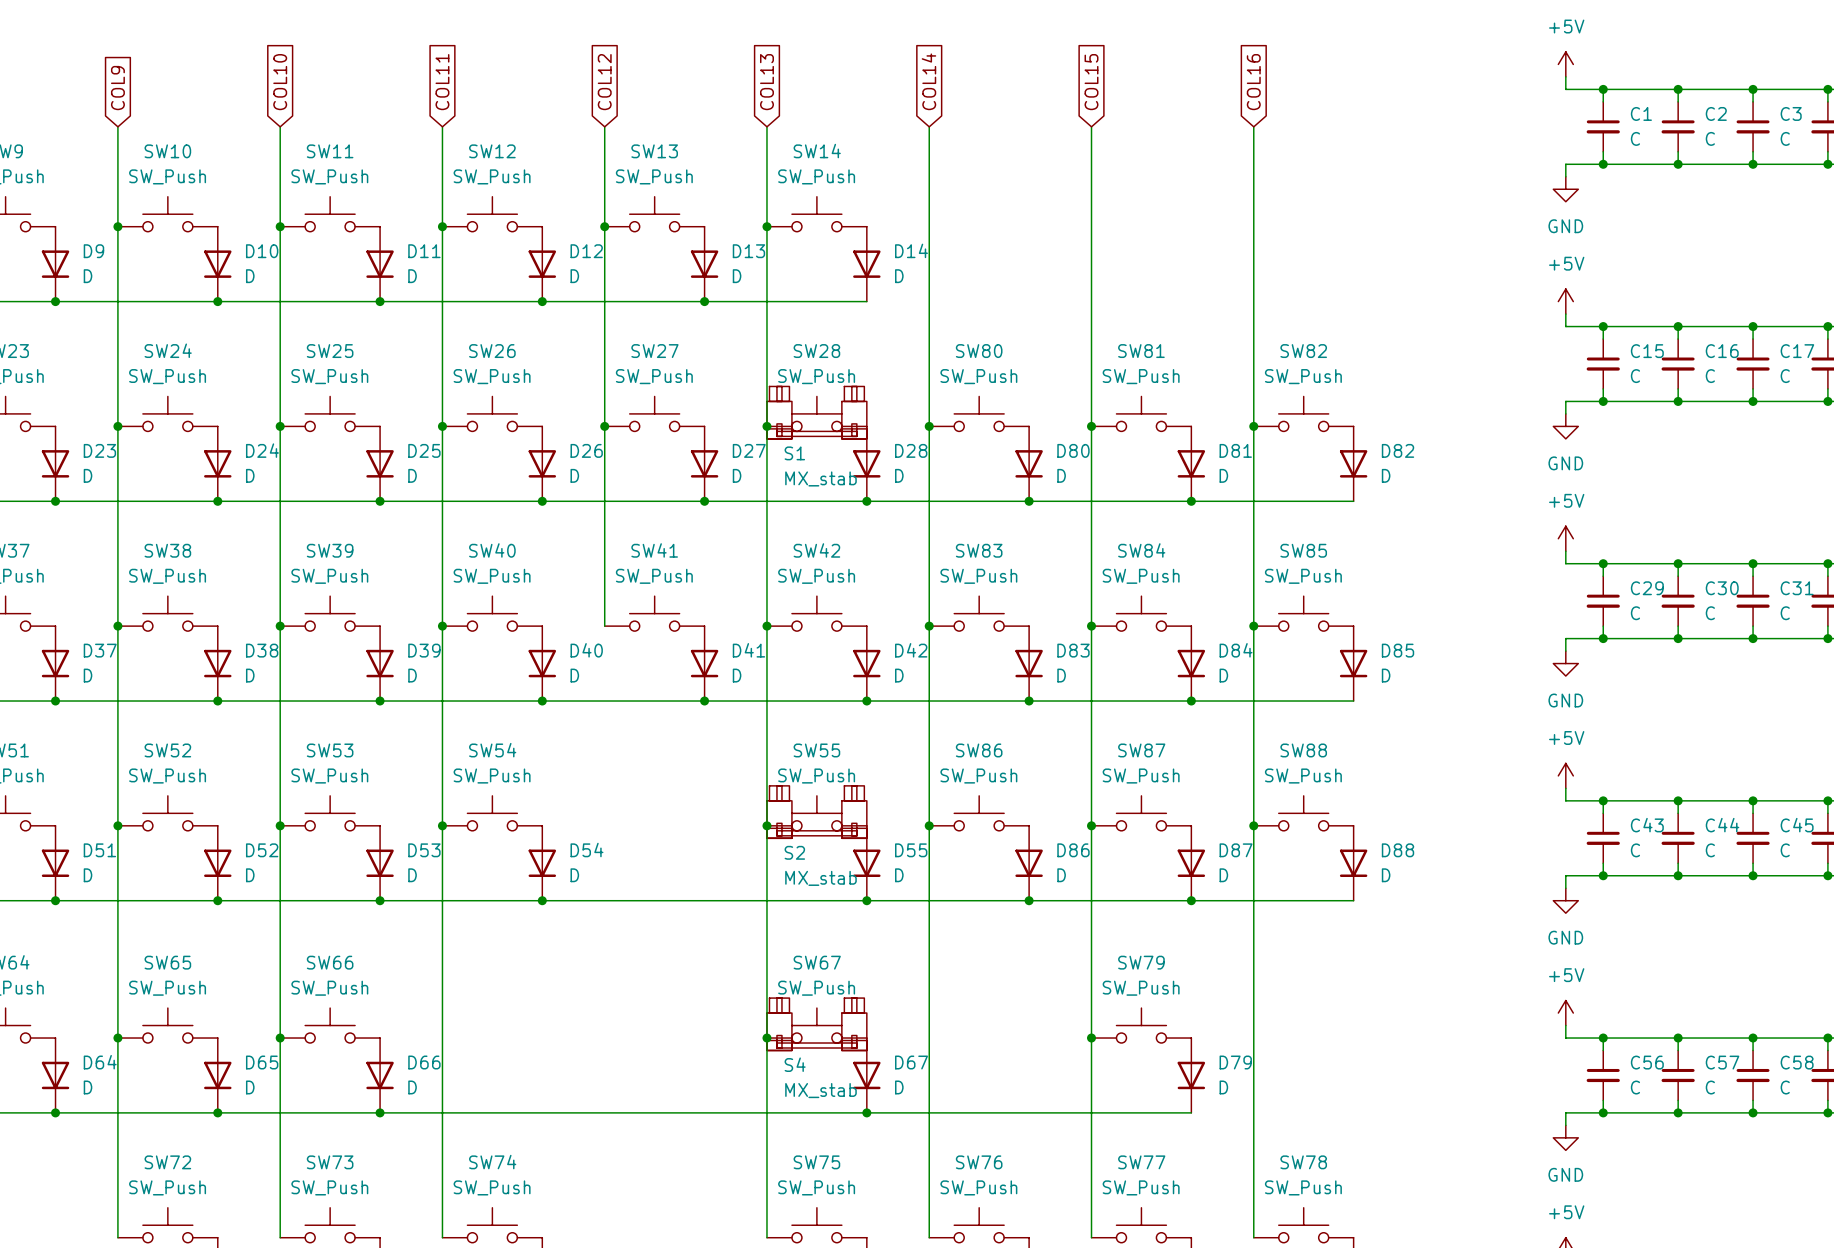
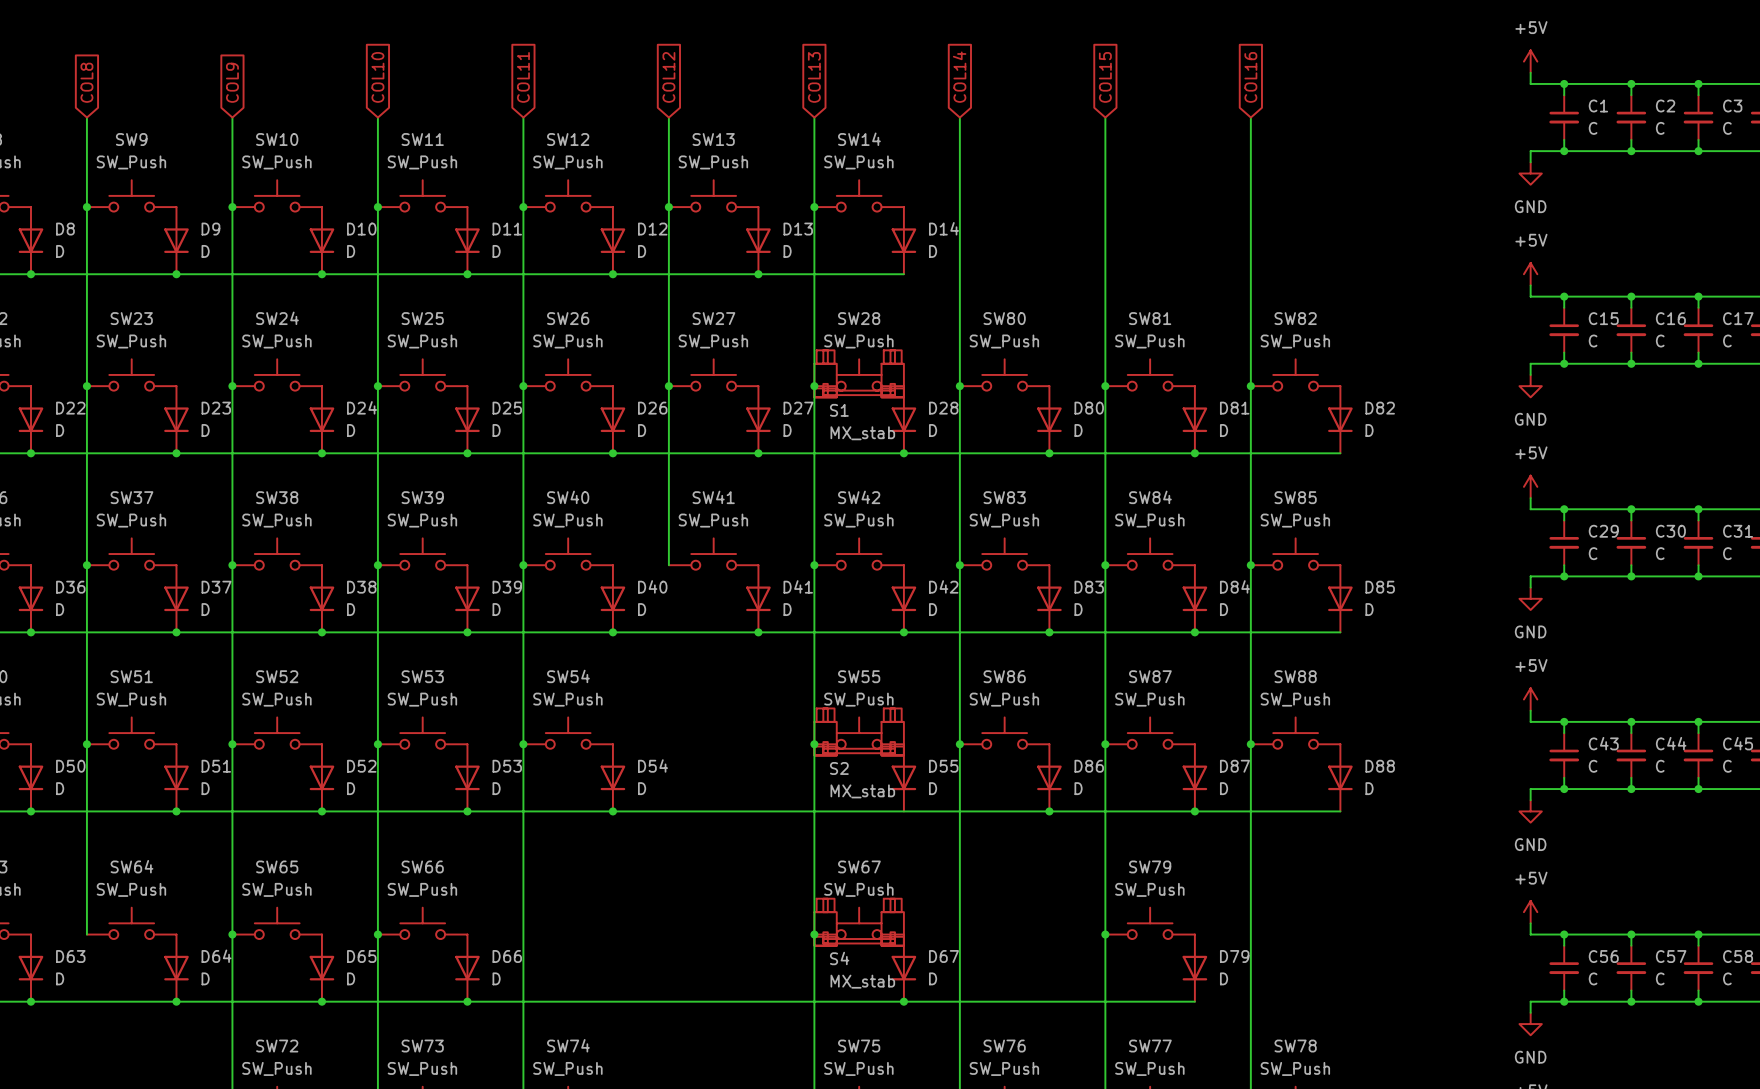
junction: (866, 900) -> none

